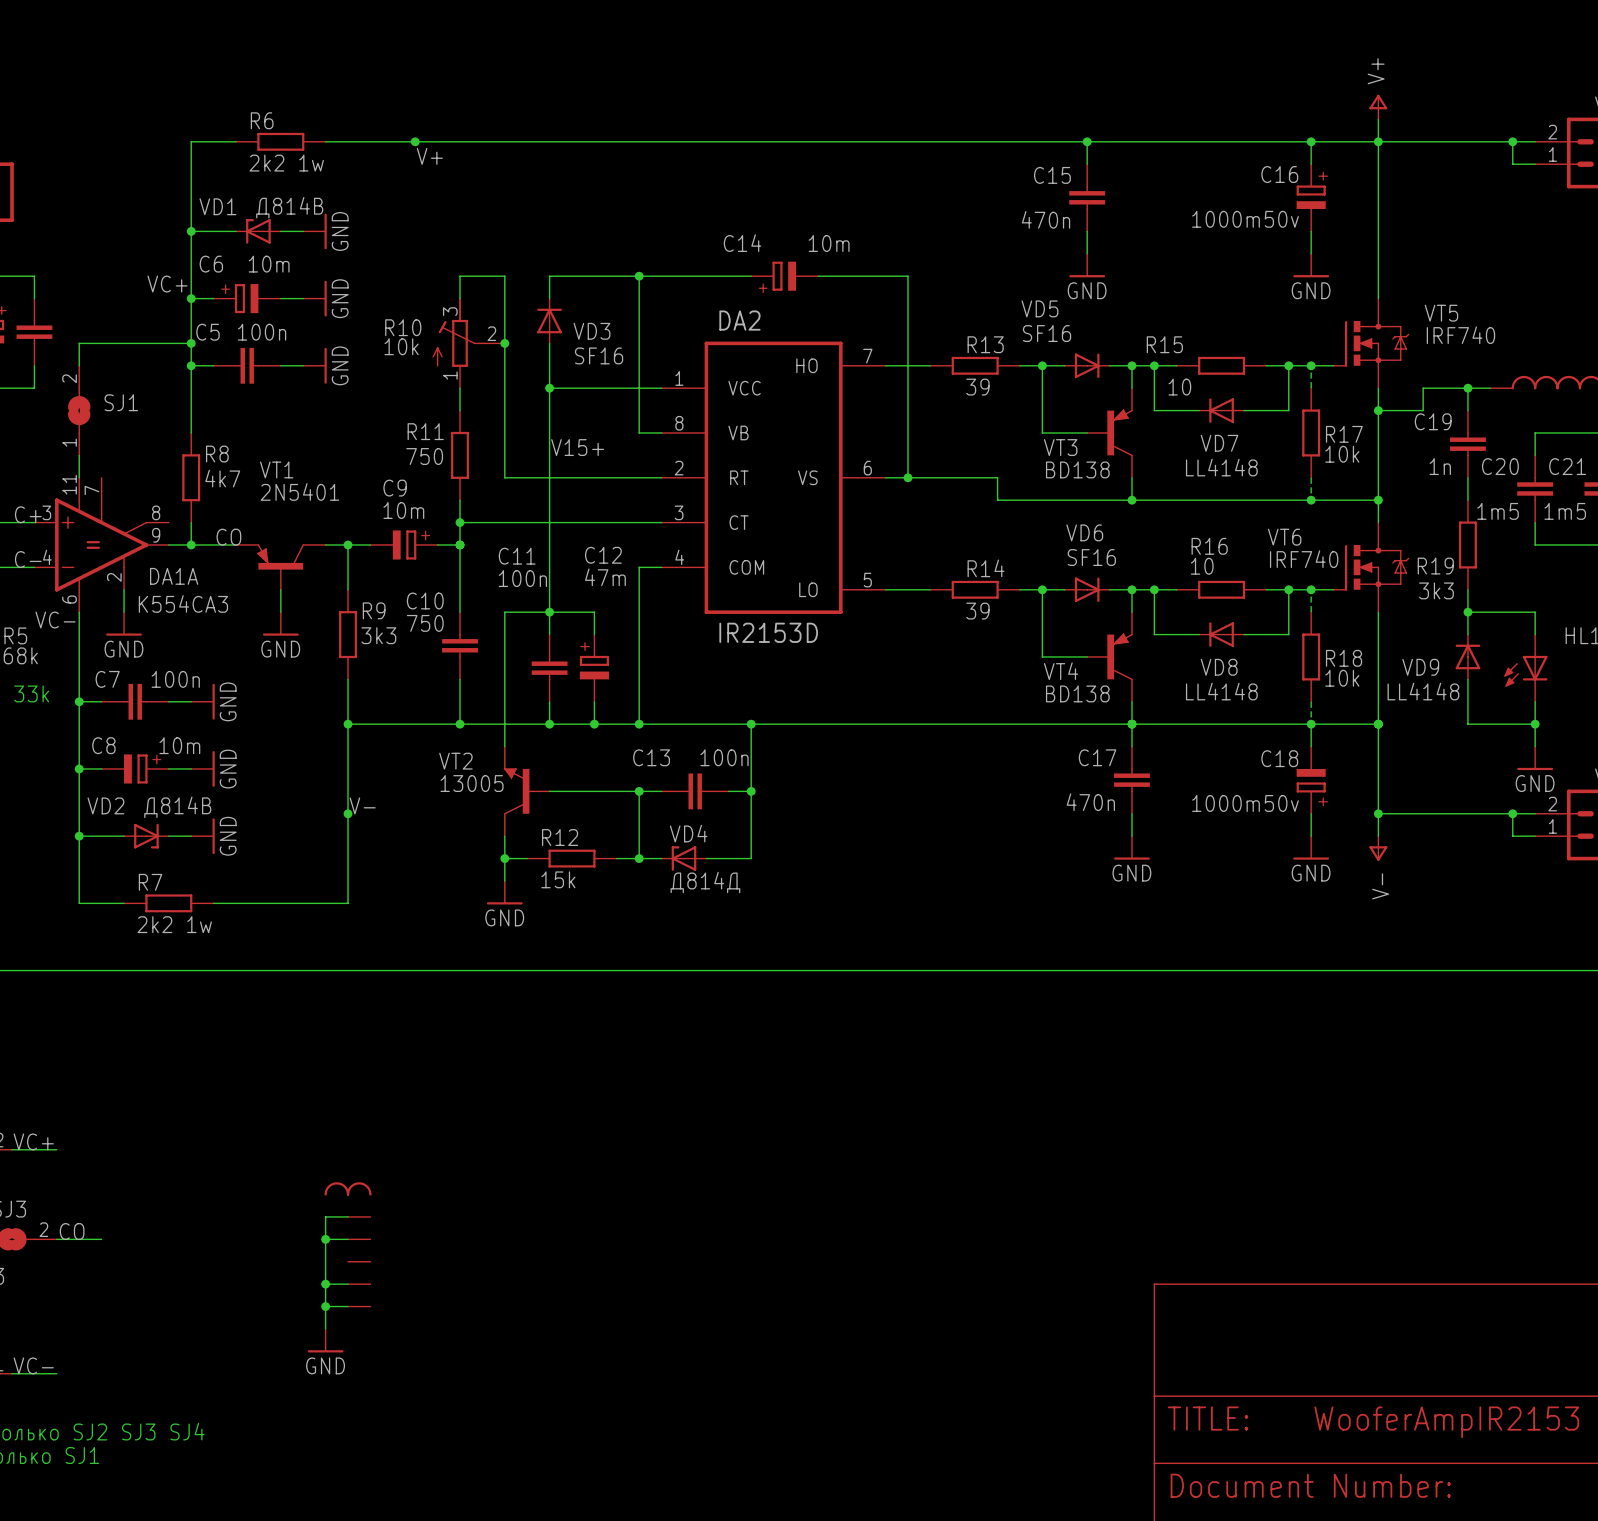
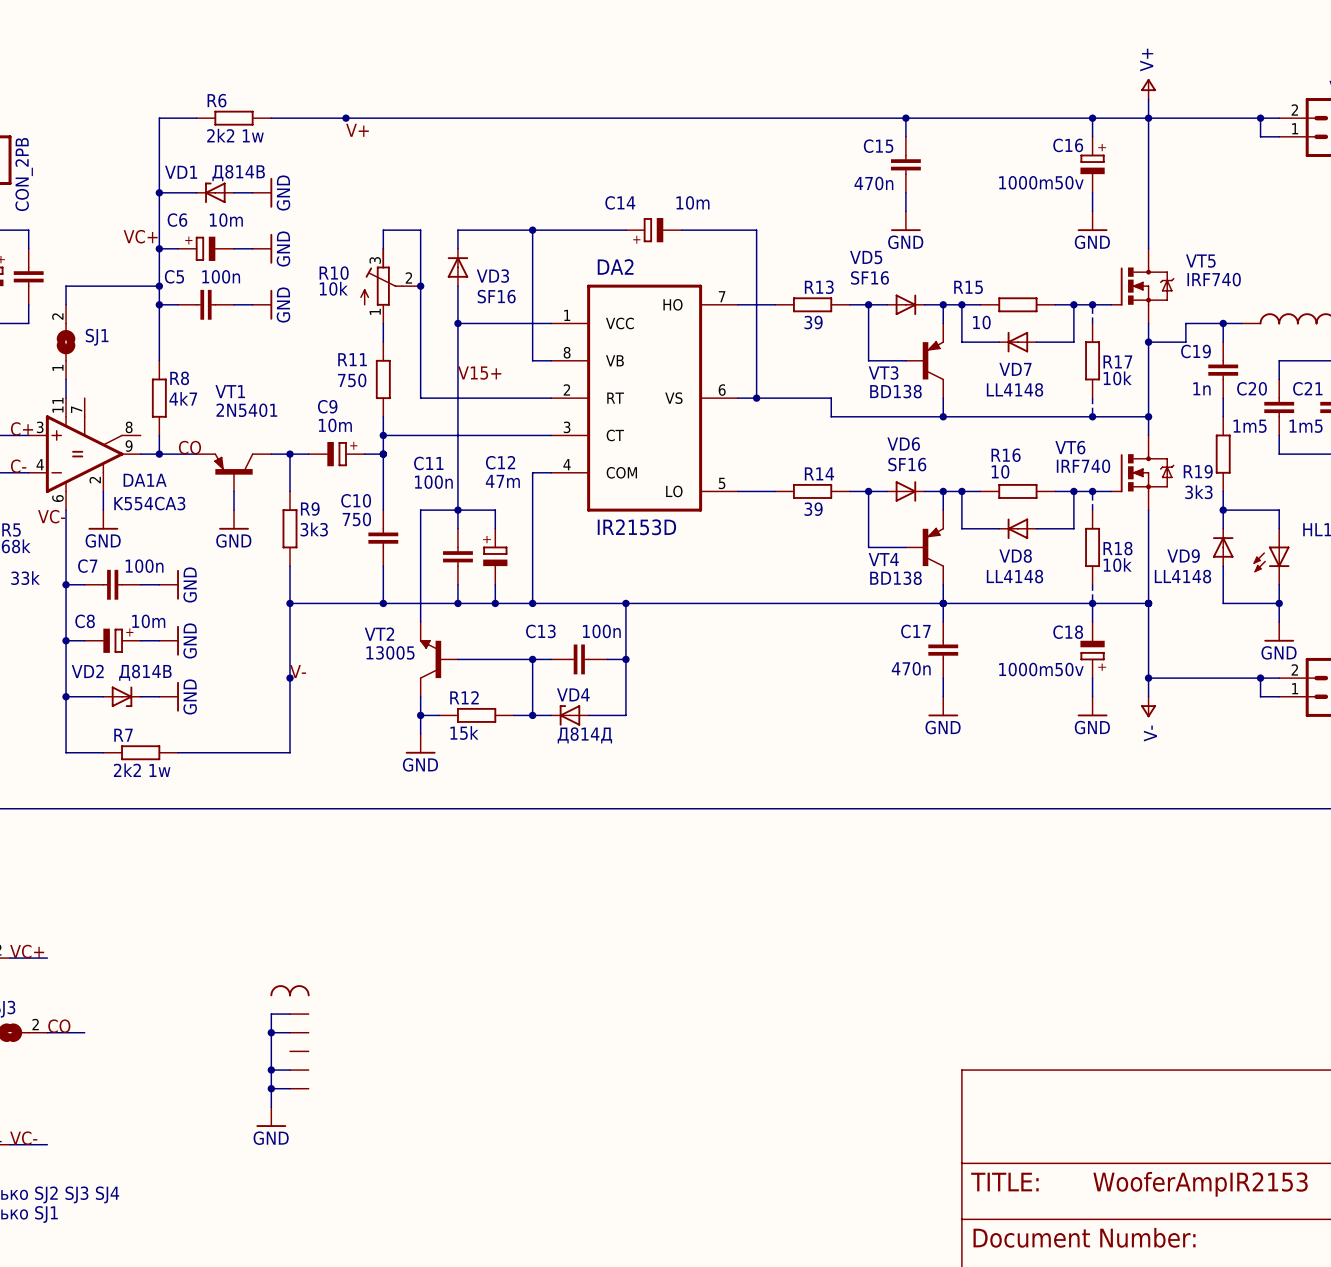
part value: none -> CON_2PB (24, 174)

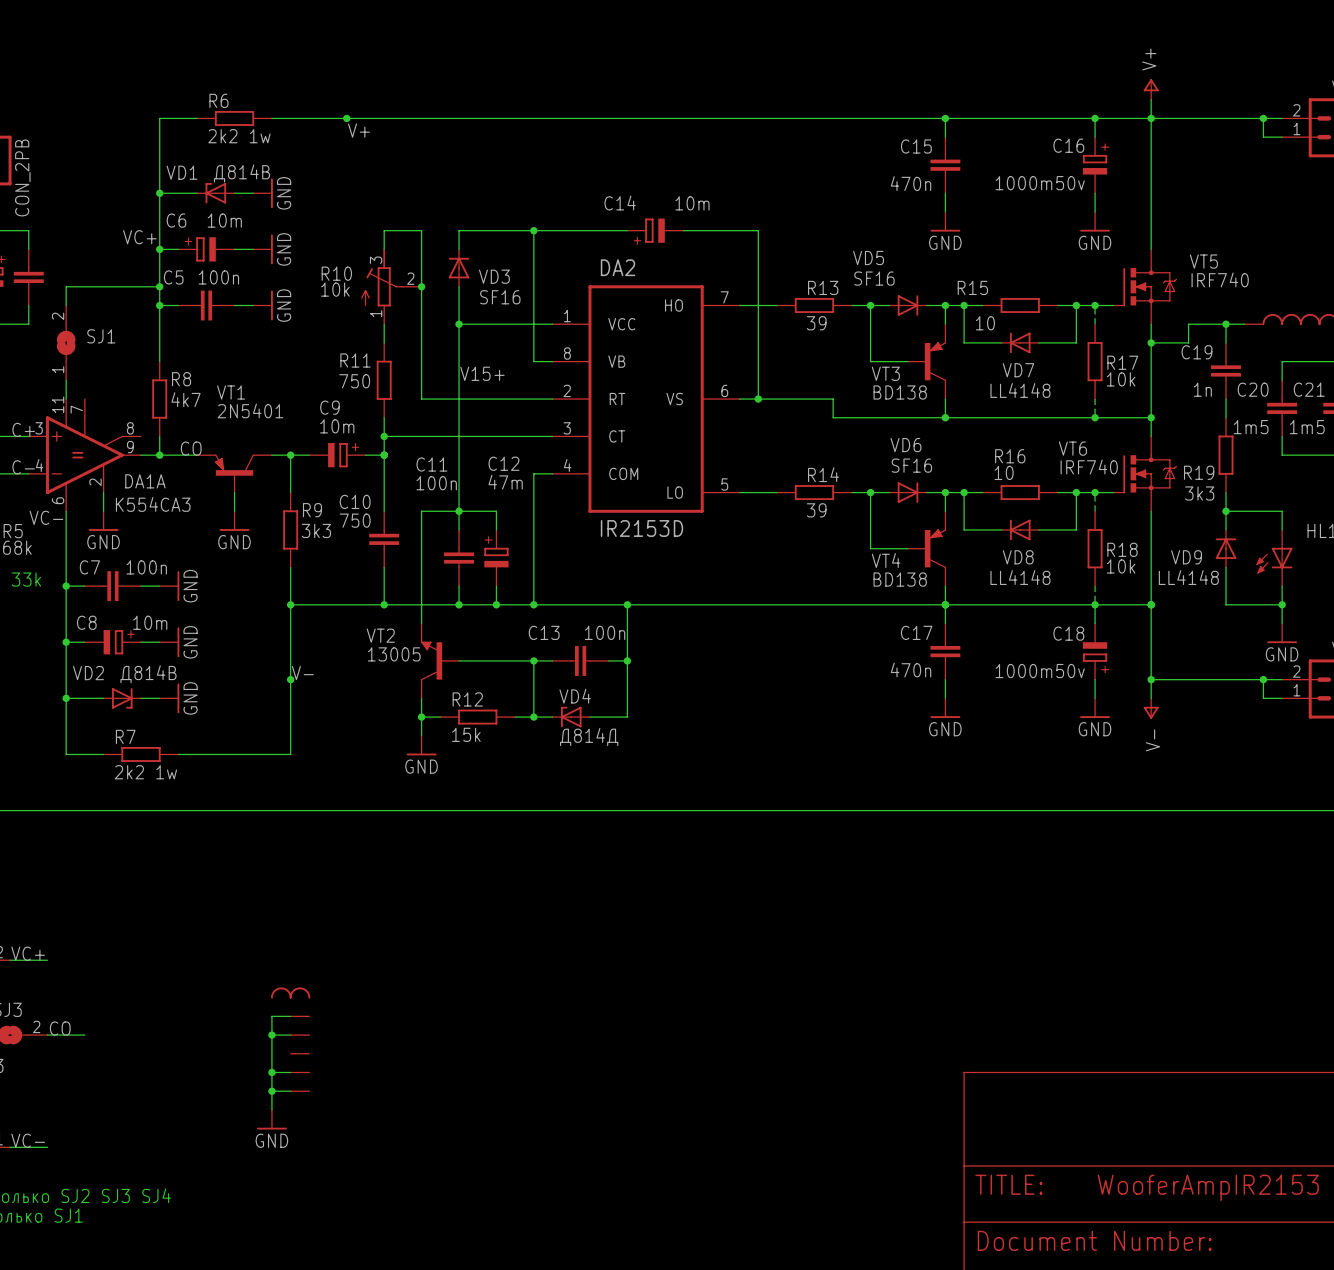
wire: (905, 118) (905, 136) -> (945, 118) (945, 137)
junction position: (905, 118) -> (945, 118)
C15 position: (905, 164) -> (945, 165)
wire: (905, 192) (905, 211) -> (945, 193) (945, 211)
power symbol position: GND (905, 221) -> GND (945, 221)

